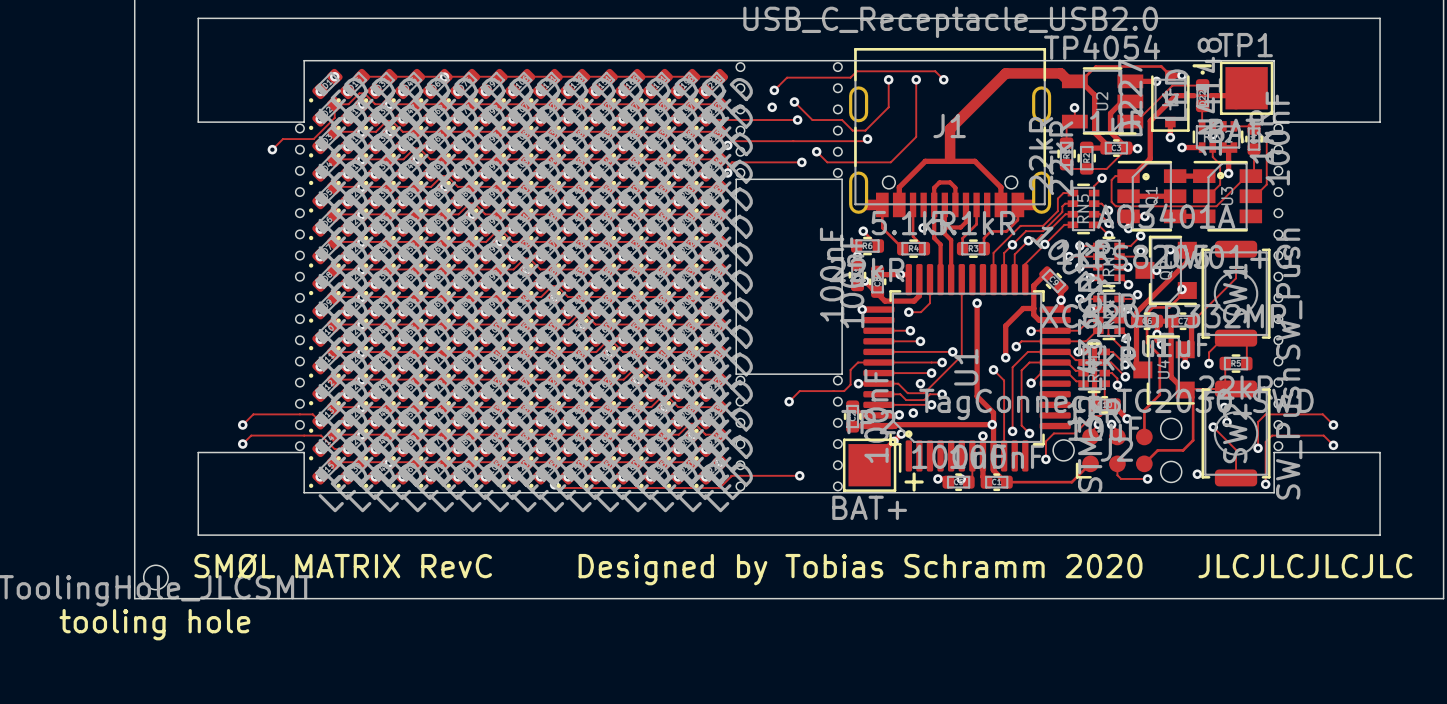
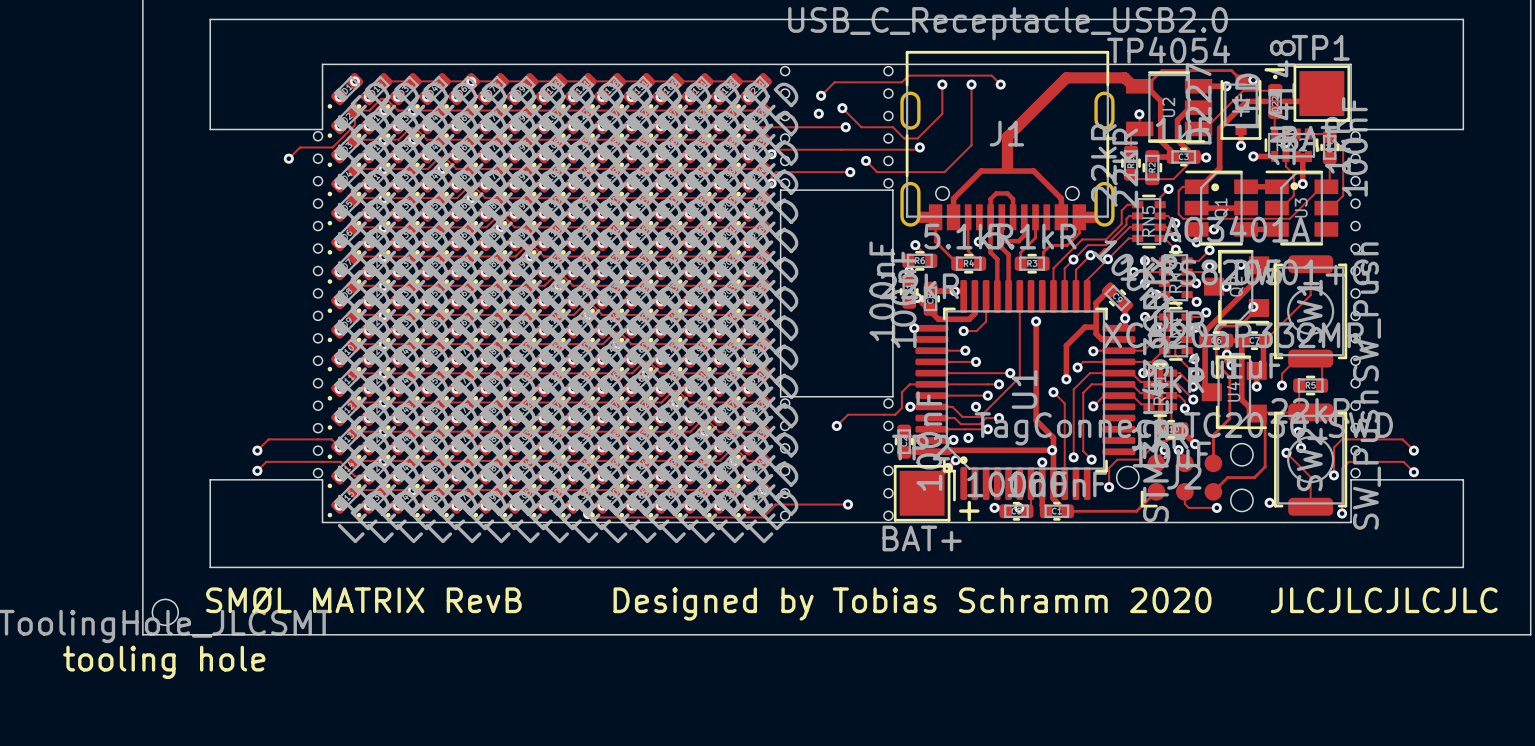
text: SMØL MATRIX RevC Designed by Tobias Schramm 2020 (668, 569) -> SMØL MATRIX RevB Designed by Tobias Schramm 2020 (708, 604)

